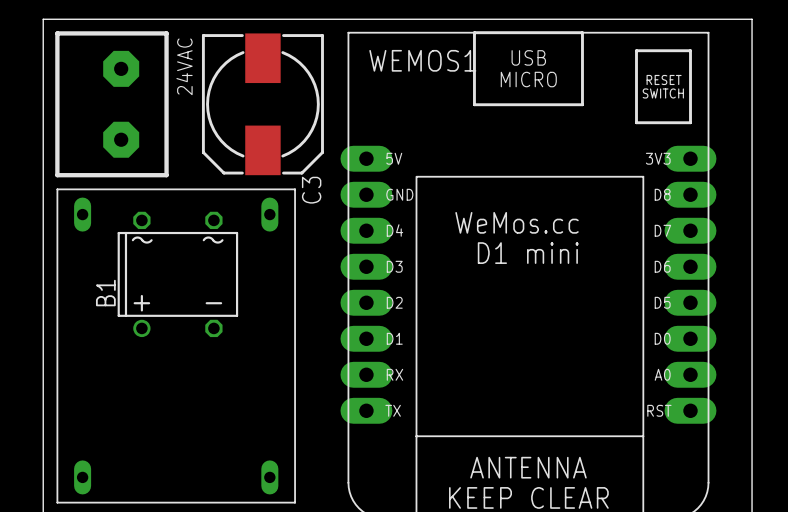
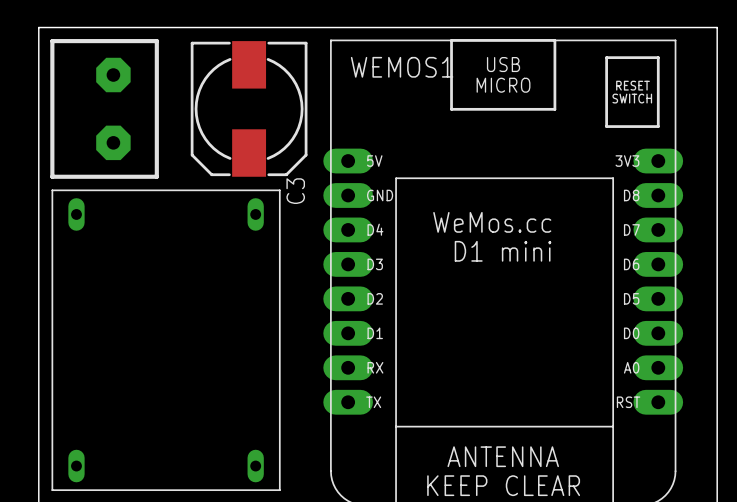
text: 24VAC (184, 66) -> none
B1: (177, 274) -> none

